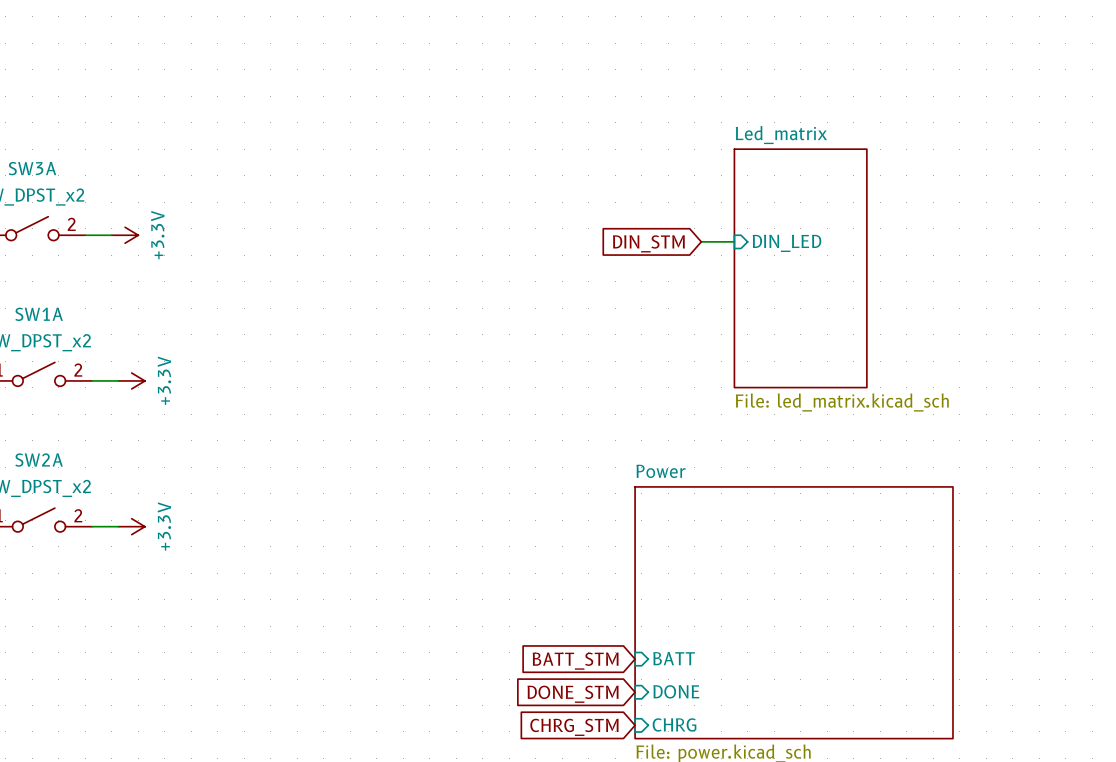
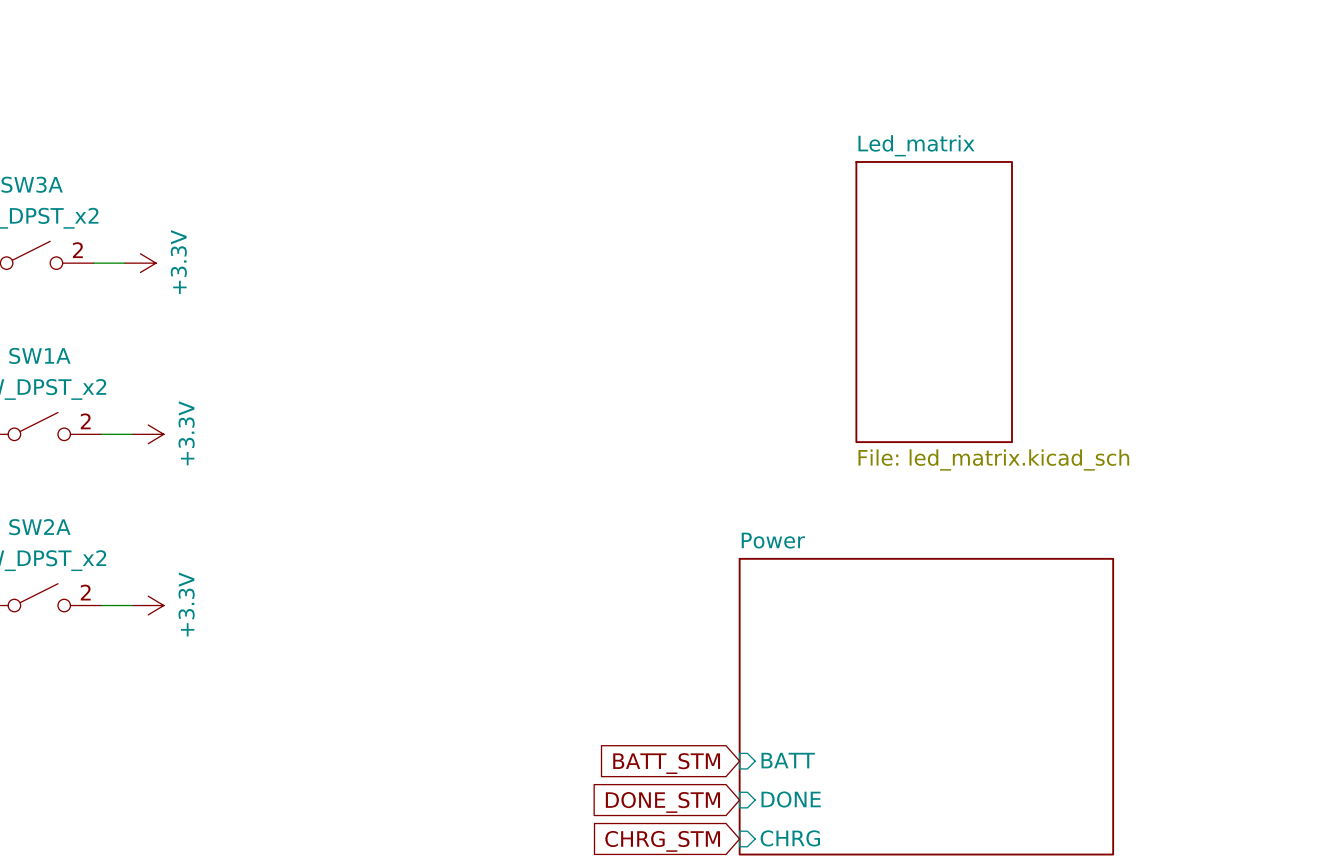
wire: (701, 241) (734, 241) -> none
global label: DIN_STM (648, 243) -> none
sheet pin: DIN_LED (787, 243) -> none

